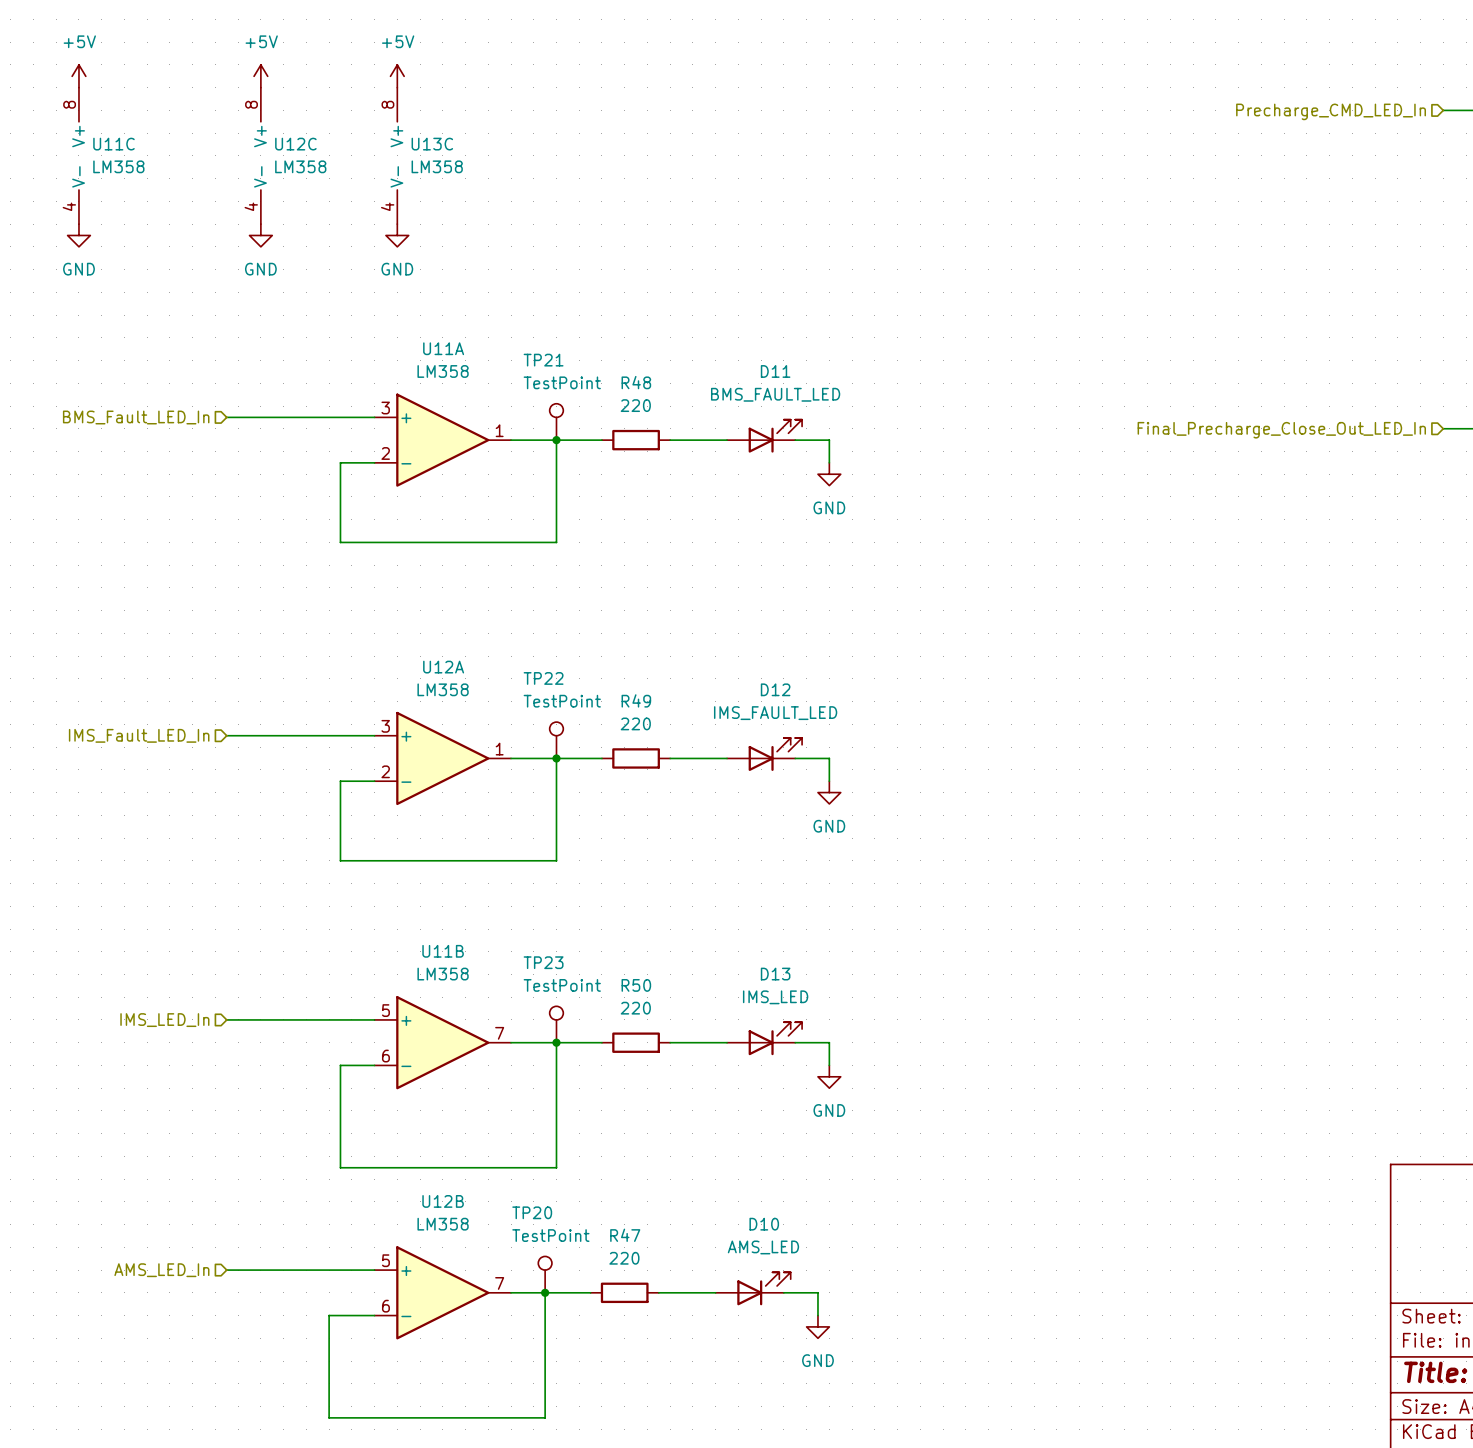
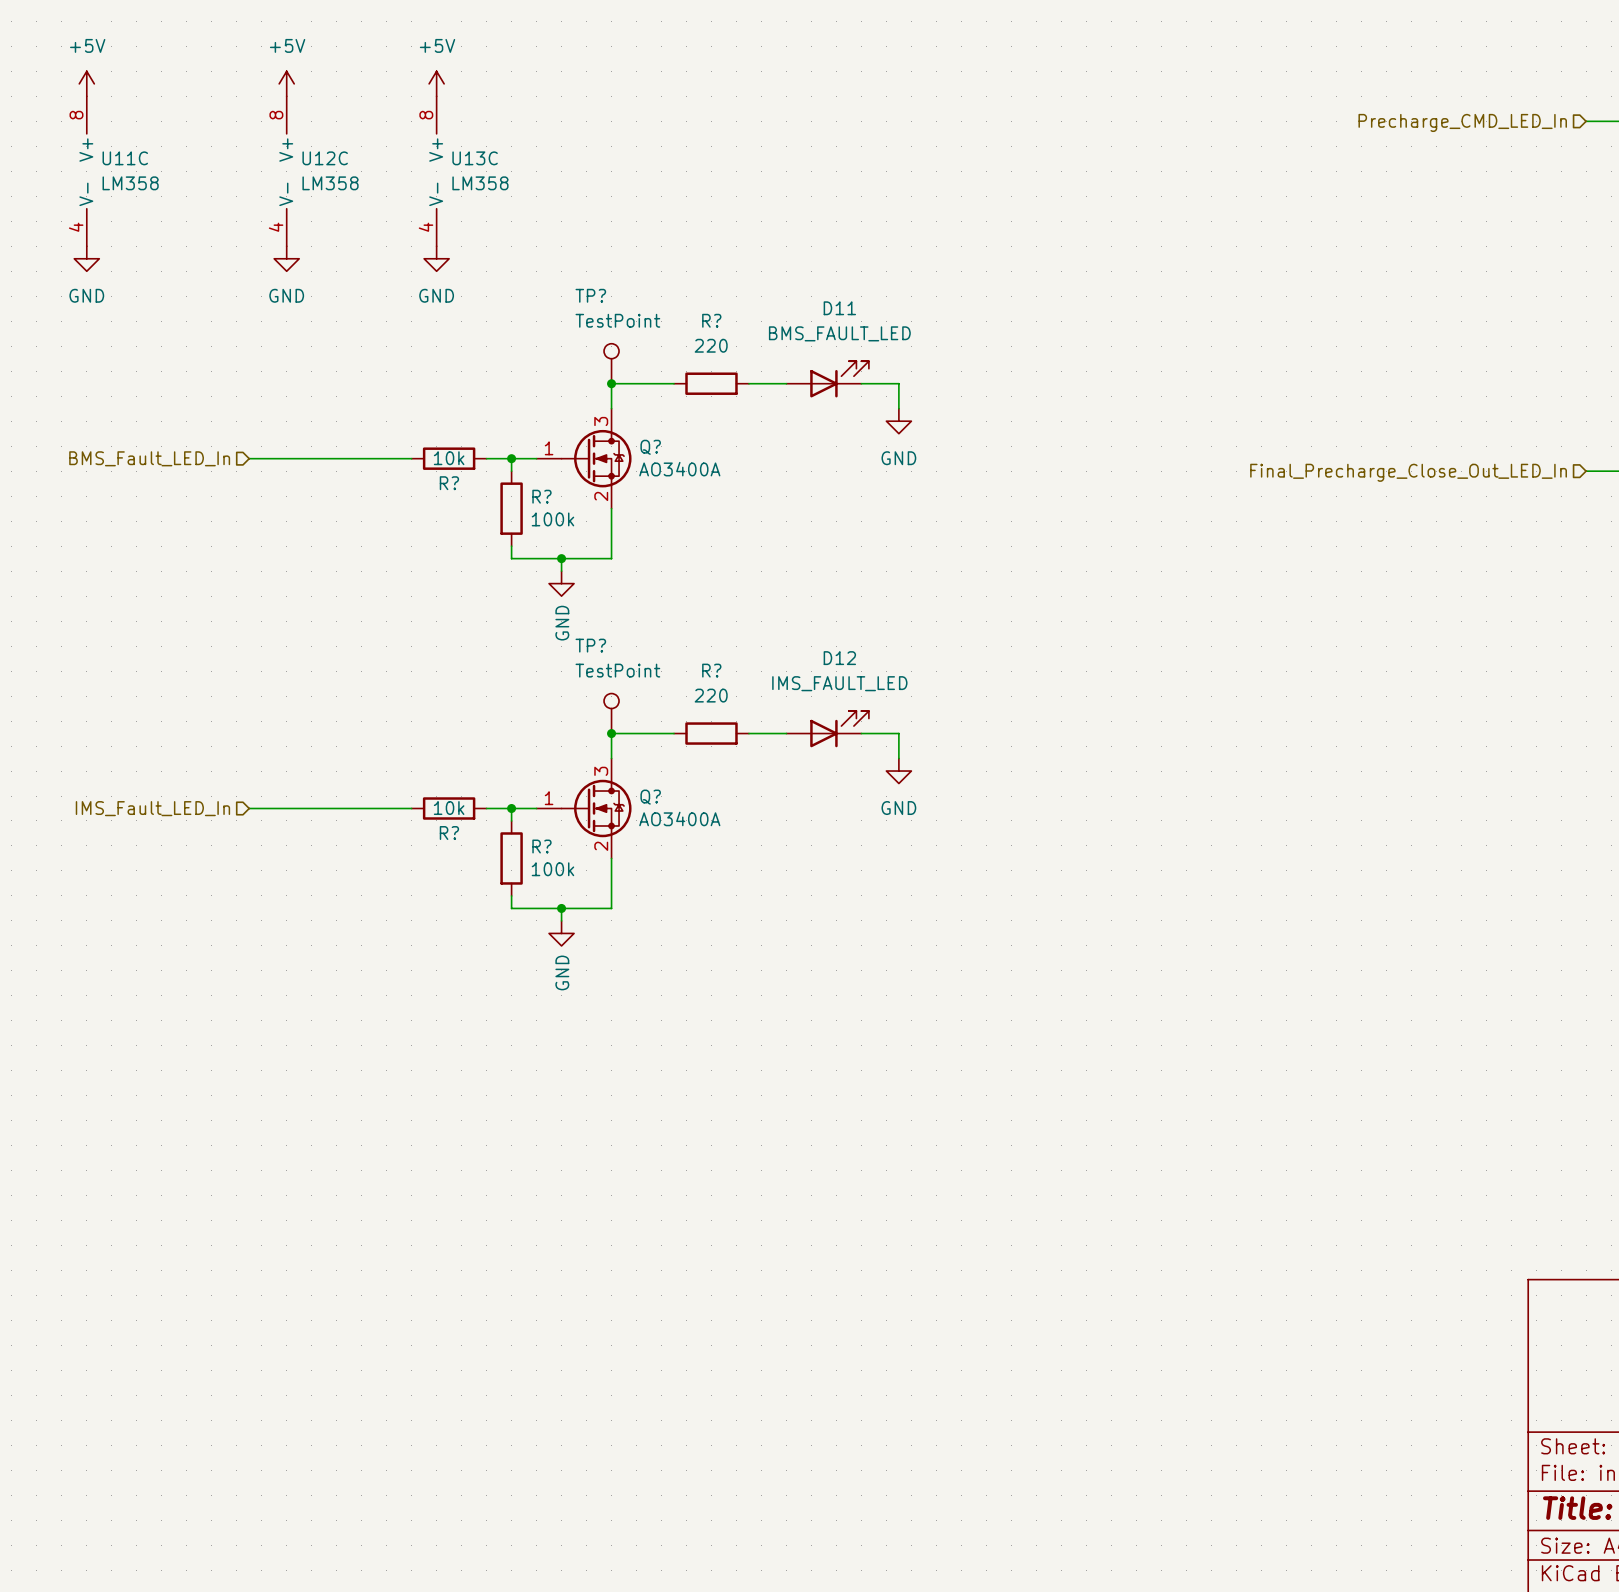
TP?: none -> TestPoint (611, 363)
junction: none -> (611, 383)
wire: none -> (674, 383) (611, 383) (611, 408)
R?: none -> 220 (711, 383)
wire: none -> (748, 383) (786, 383)
R?: none -> 10k (449, 458)
wire: none -> (486, 458) (536, 458)
wire: none -> (511, 458) (511, 471)
junction: none -> (511, 458)
Q?: none -> AO3400A (584, 458)
TP21: TestPoint (556, 421) -> none
D11 position: (764, 436) -> (827, 379)
U11A: LM358 (442, 440) -> none
wire: (511, 440) (601, 440) -> none
junction: (556, 440) -> none
R48: 220 (636, 440) -> none
wire: (670, 440) (727, 440) -> none
wire: (795, 440) (829, 440) (829, 462) -> (861, 383) (898, 383) (898, 408)
wire: (374, 462) (340, 462) (340, 542) (556, 542) (556, 508) -> (511, 546) (511, 558) (611, 558)
R?: none -> 100k (511, 508)
power symbol position: GND (829, 474) -> GND (898, 421)
wire: none -> (561, 558) (561, 571)
junction: none -> (561, 558)
power symbol: none -> GND (561, 583)
TP?: none -> TestPoint (611, 713)
junction: none -> (611, 733)
wire: none -> (674, 733) (611, 733) (611, 758)
R?: none -> 220 (711, 733)
wire: none -> (748, 733) (786, 733)
R?: none -> 10k (449, 808)
wire: none -> (486, 808) (536, 808)
wire: none -> (511, 808) (511, 820)
junction: none -> (511, 808)
Q?: none -> AO3400A (584, 808)
TP22: TestPoint (556, 740) -> none
D12 position: (764, 754) -> (827, 729)
U12A: LM358 (442, 758) -> none
wire: (511, 758) (601, 758) -> none
junction: (556, 758) -> none
R49: 220 (636, 758) -> none
wire: (670, 758) (727, 758) -> none
wire: (795, 758) (829, 758) (829, 781) -> (861, 733) (898, 733) (898, 758)
wire: (374, 781) (340, 781) (340, 860) (556, 860) (556, 826) -> (511, 895) (511, 908) (611, 908)
R?: none -> 100k (511, 858)
power symbol position: GND (829, 792) -> GND (898, 771)
wire: none -> (561, 908) (561, 920)
junction: none -> (561, 908)
power symbol: none -> GND (561, 933)
wire: (226, 1019) (374, 1019) -> none
hierarchical label: IMS_LED_In (164, 1020) -> none
TP23: TestPoint (556, 1024) -> none
D13: IMS_LED (764, 1038) -> none
U11B: LM358 (442, 1042) -> none
wire: (511, 1042) (601, 1042) -> none
wire: (556, 1042) (556, 1167) (340, 1167) (340, 1065) (374, 1065) -> none
junction: (556, 1042) -> none
R50: 220 (636, 1042) -> none
wire: (670, 1042) (727, 1042) -> none
wire: (795, 1042) (829, 1042) (829, 1065) -> none
power symbol: GND (829, 1076) -> none
hierarchical label: AMS_LED_In (161, 1270) -> none
wire: (226, 1270) (374, 1270) -> none
TP20: TestPoint (545, 1274) -> none
D10: AMS_LED (753, 1288) -> none
U12B: LM358 (442, 1292) -> none
wire: (511, 1292) (590, 1292) -> none
wire: (545, 1292) (545, 1417) (329, 1417) (329, 1315) (374, 1315) -> none
junction: (545, 1292) -> none
R47: 220 (624, 1292) -> none
wire: (658, 1292) (715, 1292) -> none
wire: (783, 1292) (817, 1292) (817, 1315) -> none
power symbol: GND (817, 1326) -> none

